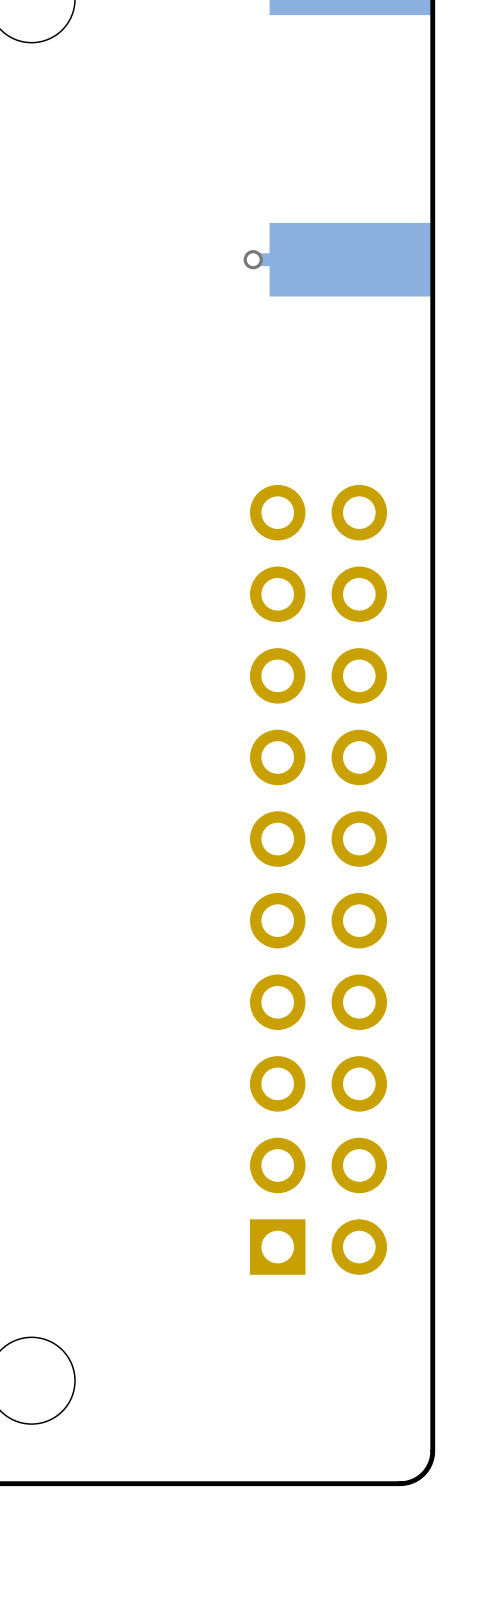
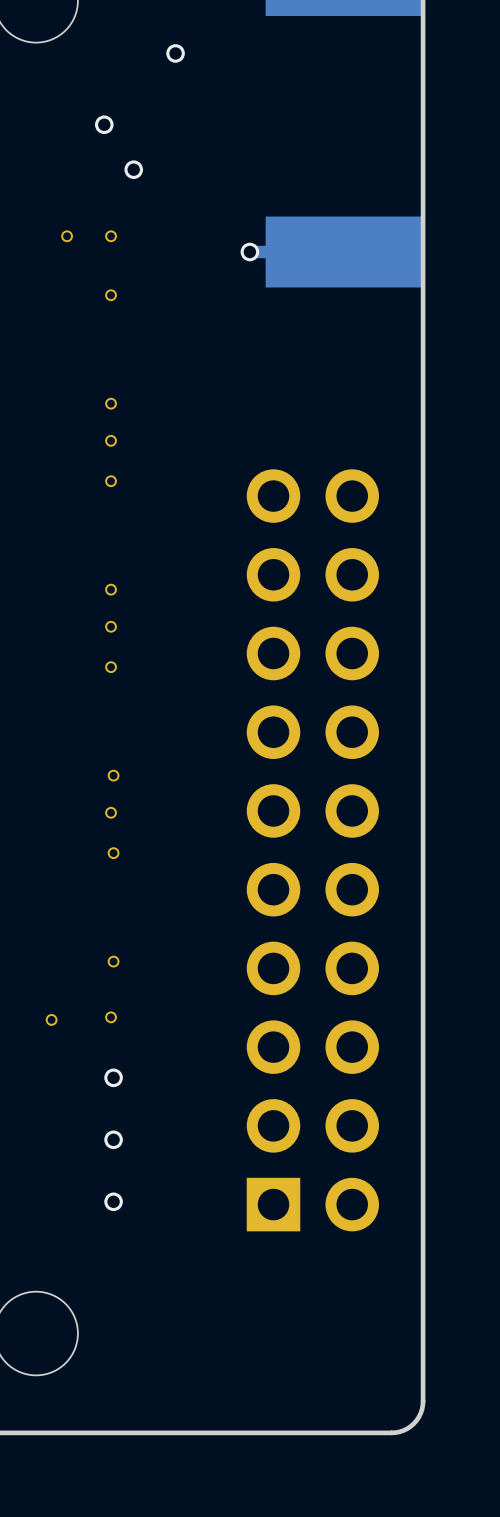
via: none -> (175, 53)
via: none -> (104, 124)
via: none -> (133, 169)
part: none -> (67, 236)
part: none -> (111, 236)
part: none -> (111, 295)
part: none -> (111, 403)
part: none -> (111, 440)
part: none -> (111, 481)
part: none -> (111, 589)
part: none -> (111, 626)
part: none -> (111, 667)
part: none -> (113, 775)
part: none -> (111, 812)
part: none -> (113, 853)
part: none -> (113, 961)
part: none -> (111, 1017)
part: none -> (51, 1019)
via: none -> (113, 1077)
via: none -> (113, 1139)
via: none -> (113, 1201)

